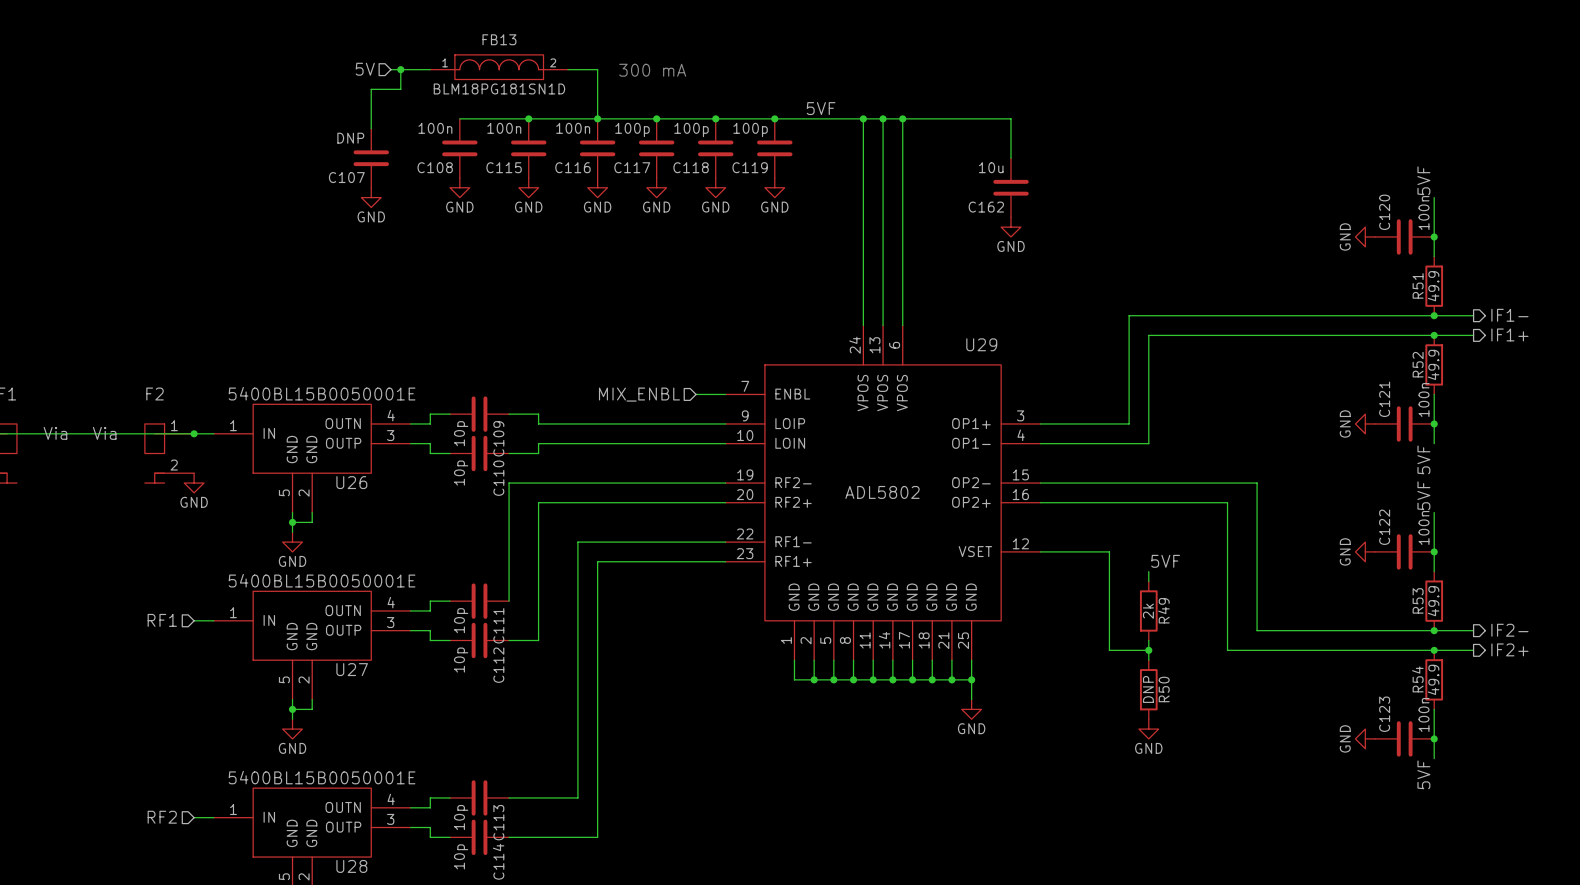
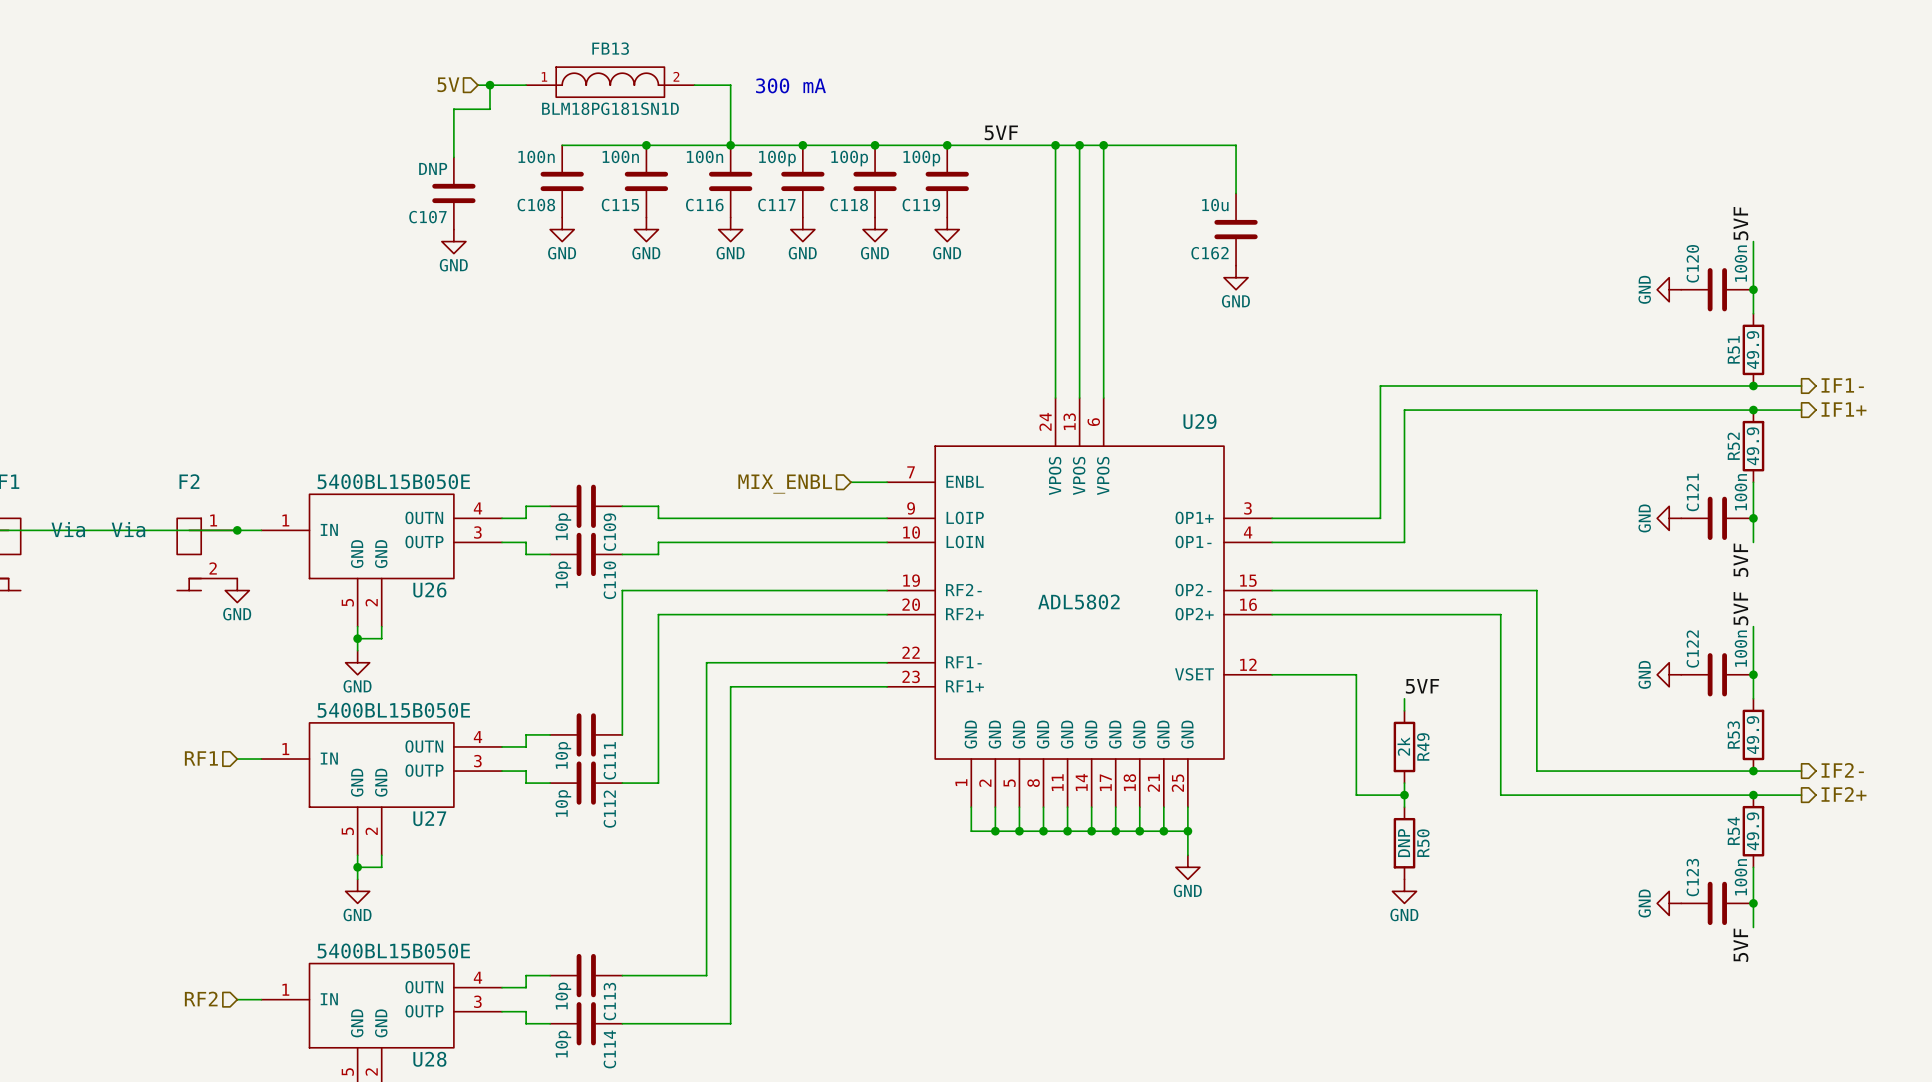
U26 value: 5400BL15B0050001E (322, 393) -> 5400BL15B050E (393, 481)
U27 value: 5400BL15B0050001E (322, 580) -> 5400BL15B050E (393, 710)
U28 value: 5400BL15B0050001E (322, 777) -> 5400BL15B050E (393, 951)

